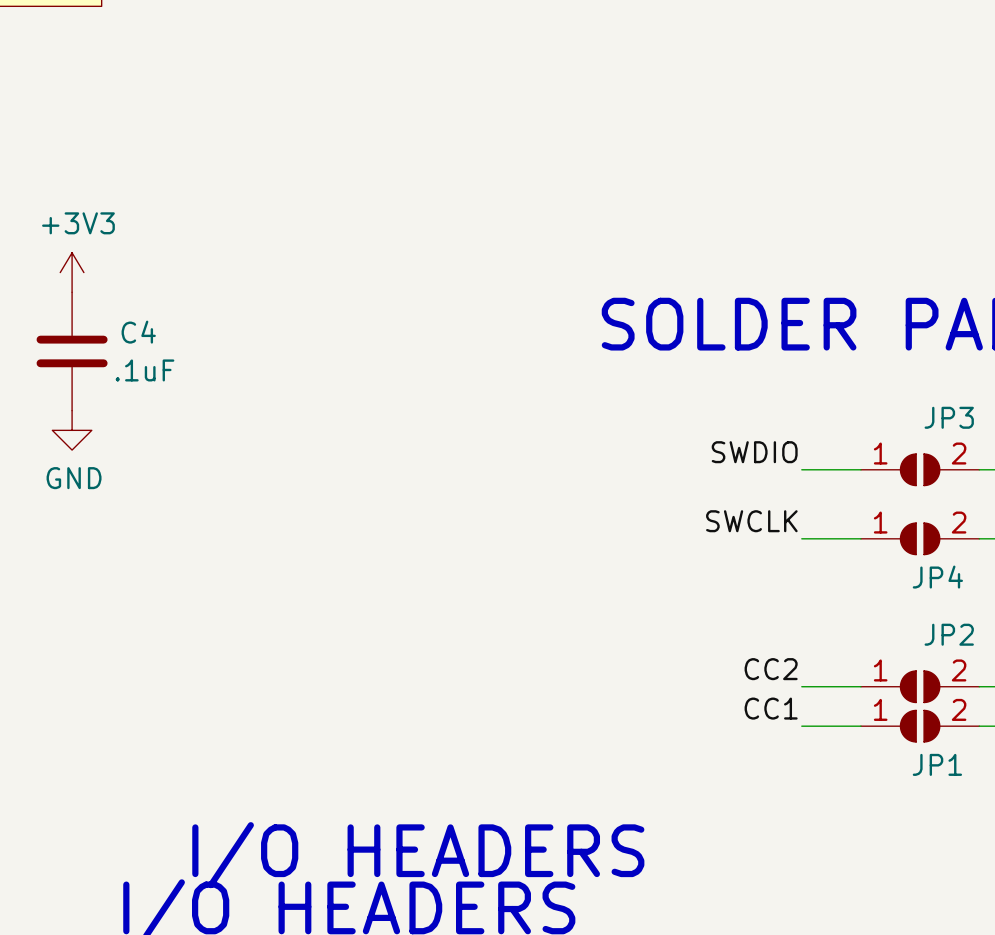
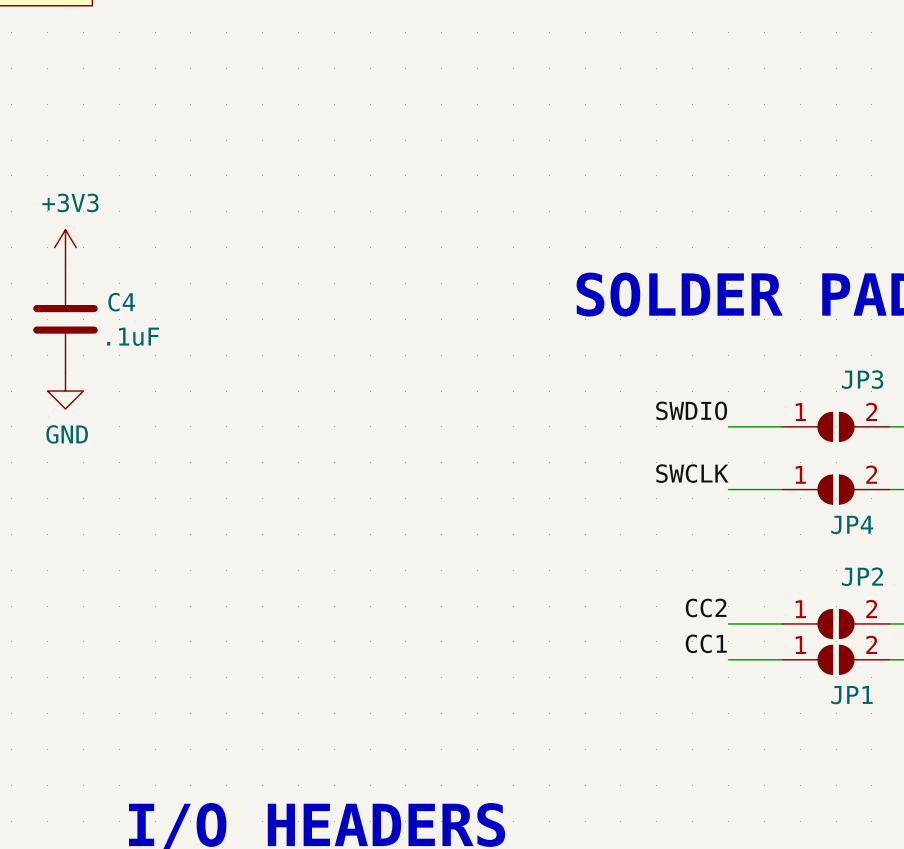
text: I/O HEADERS (418, 855) -> none

